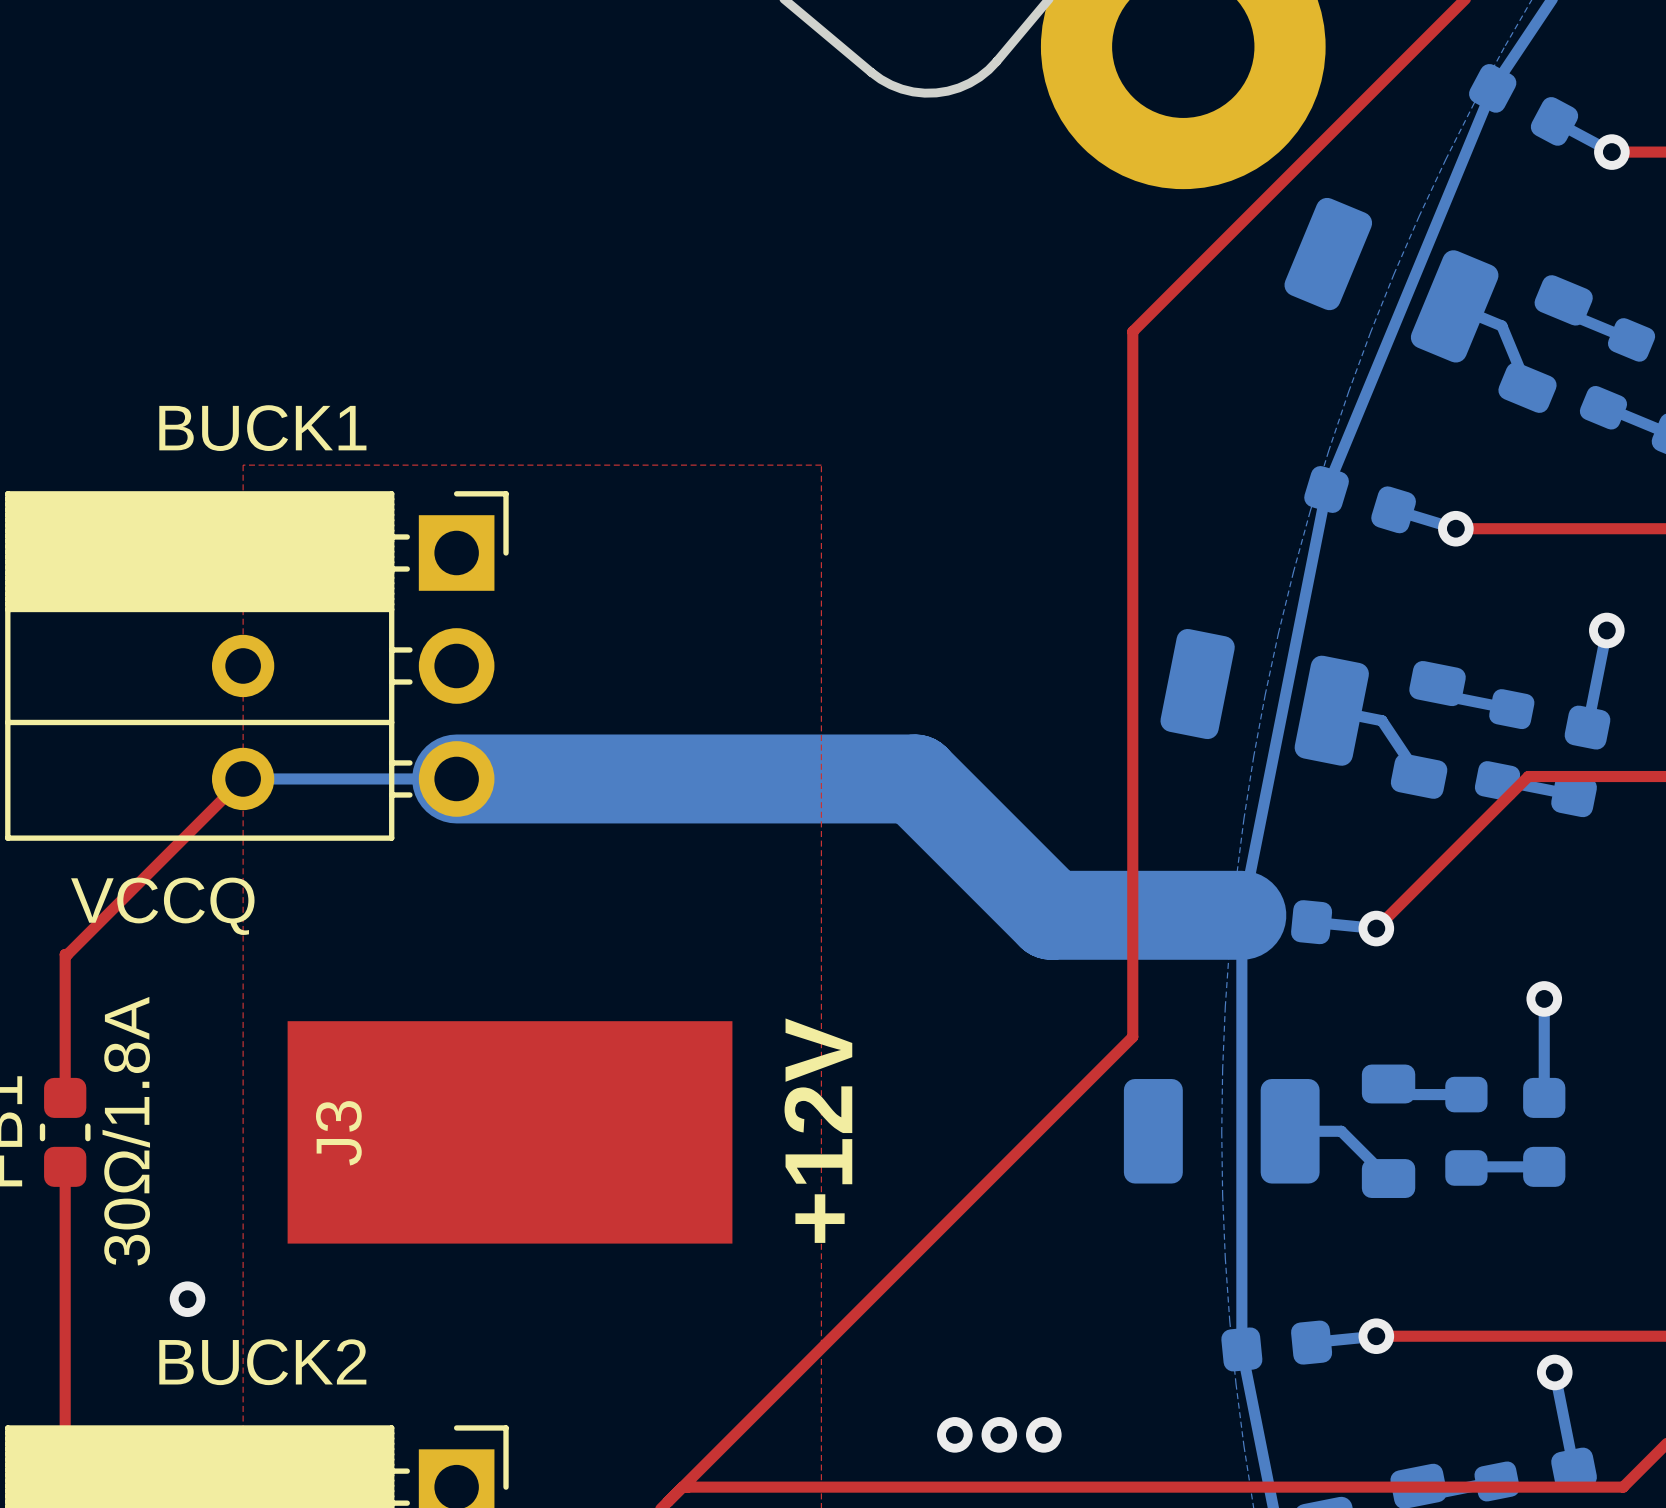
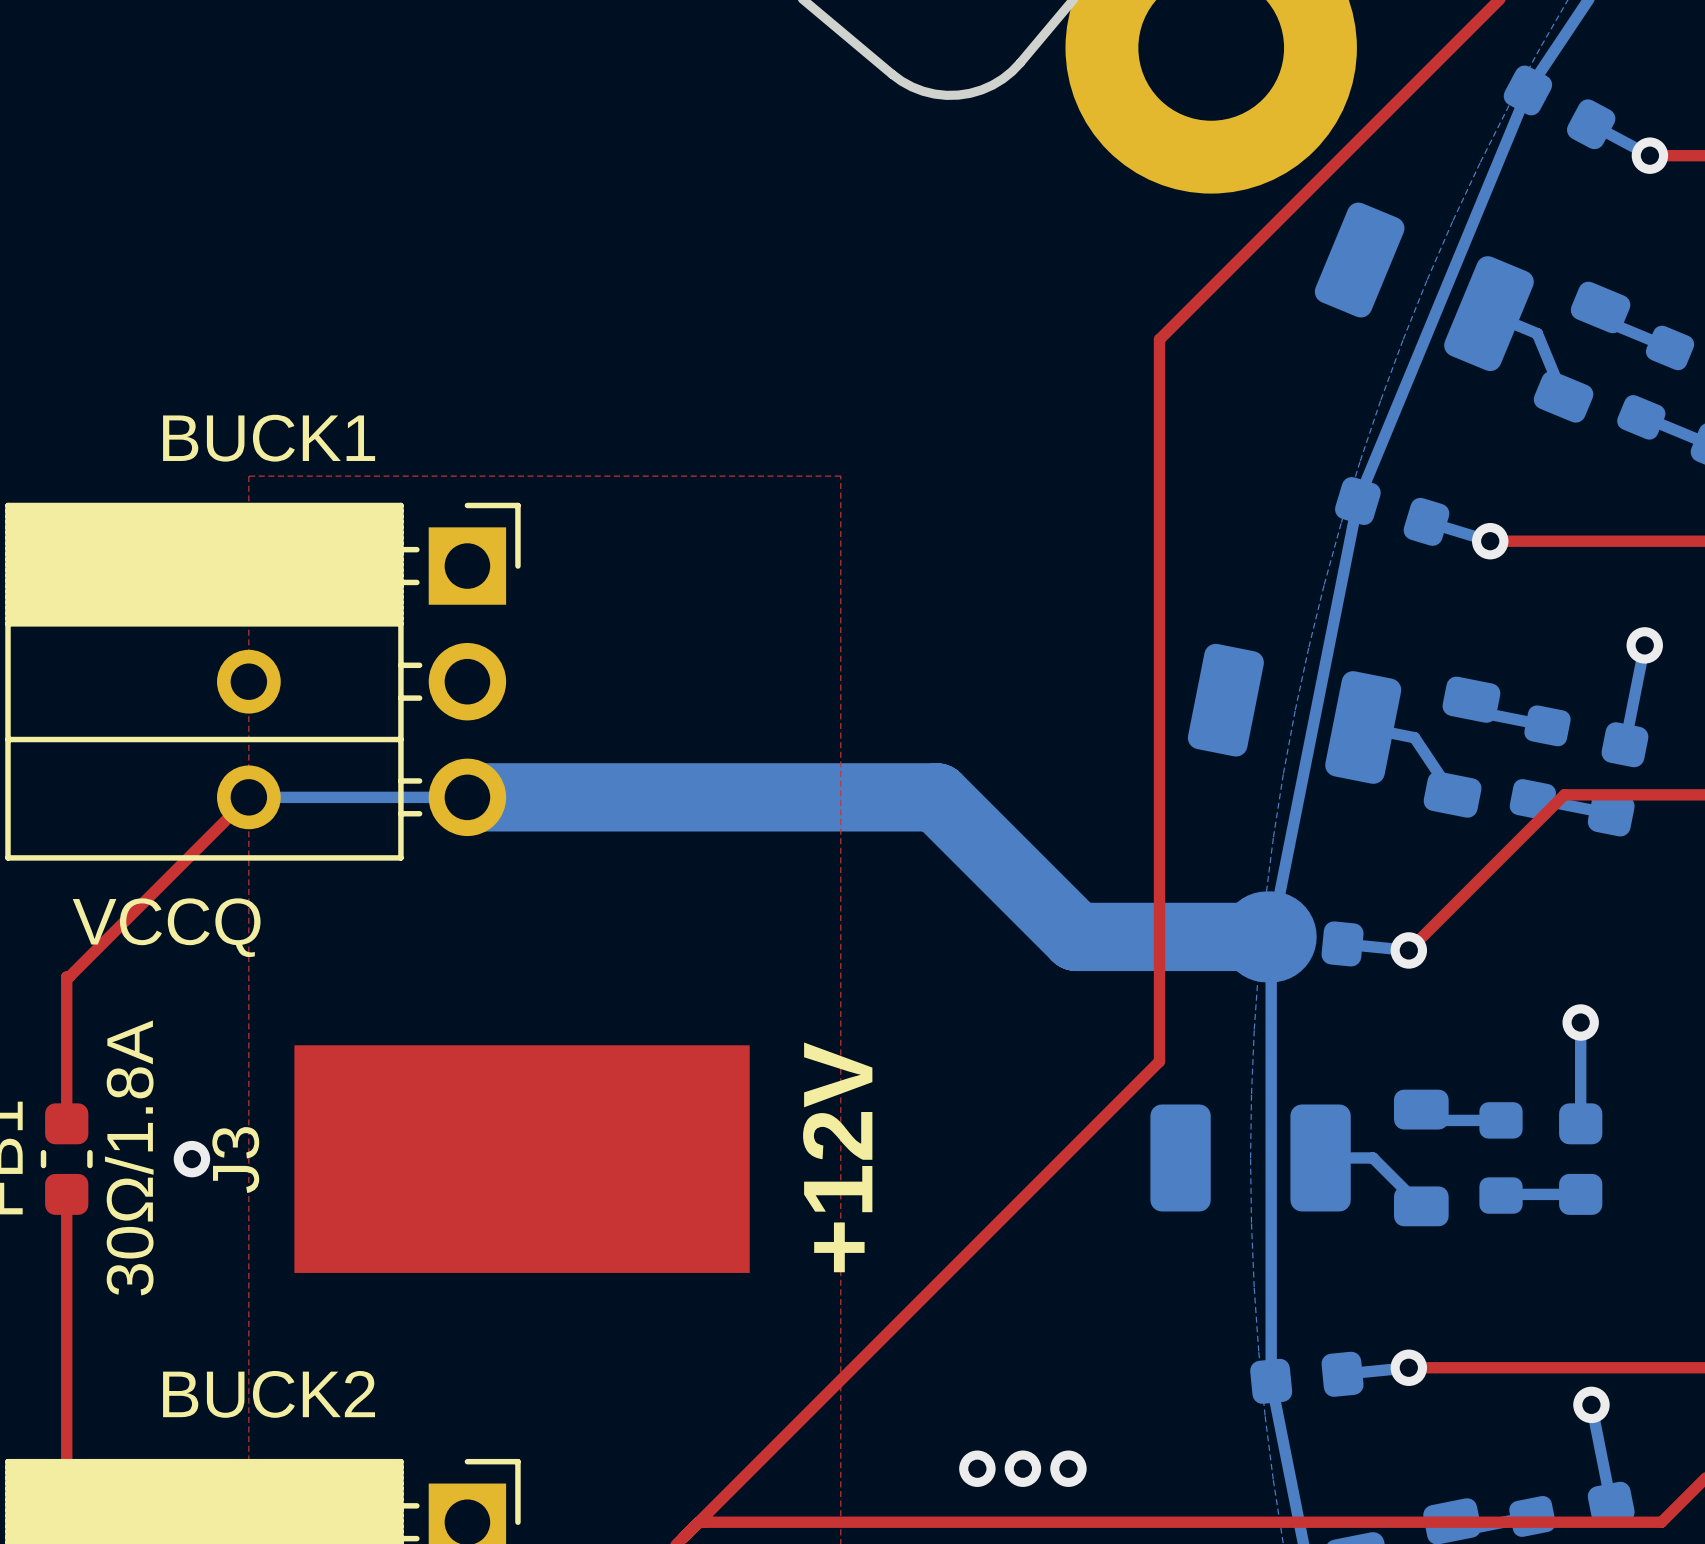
bottom track width: thick (456, 778) (915, 778) (1051, 915) (1237, 915) -> thin (467, 797) (936, 797) (1076, 936) (1266, 936)
J3 name position: J3 (338, 1133) -> J3 (235, 1160)
via position: (187, 1299) -> (191, 1159)

